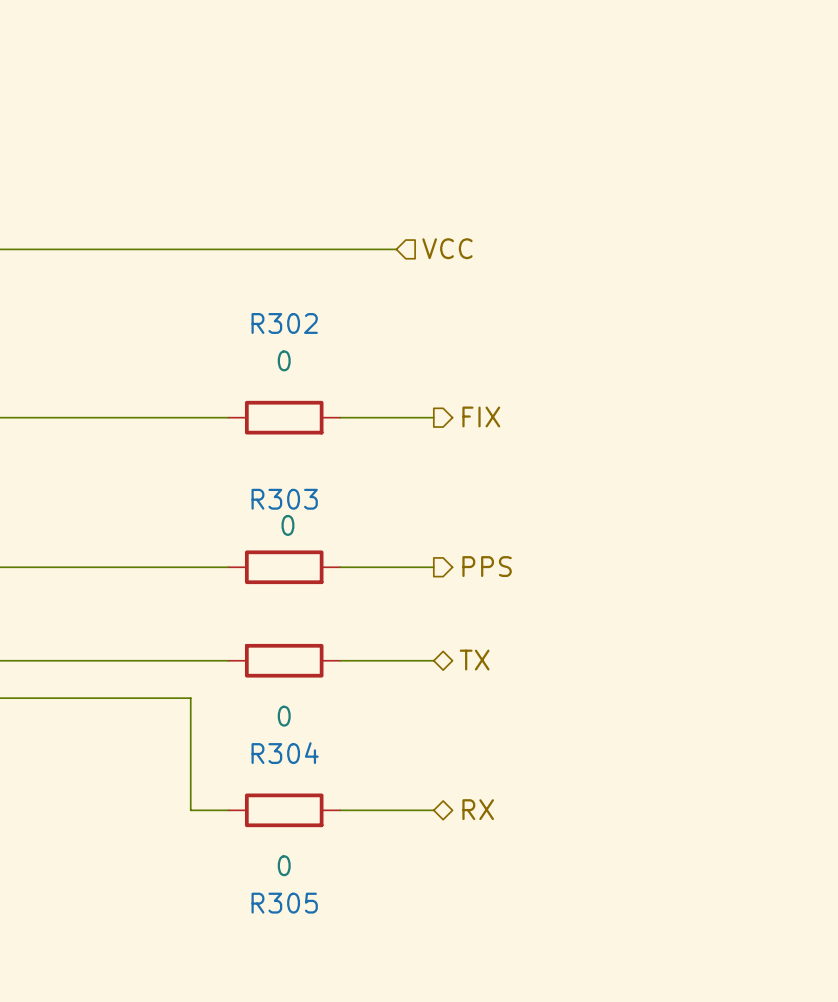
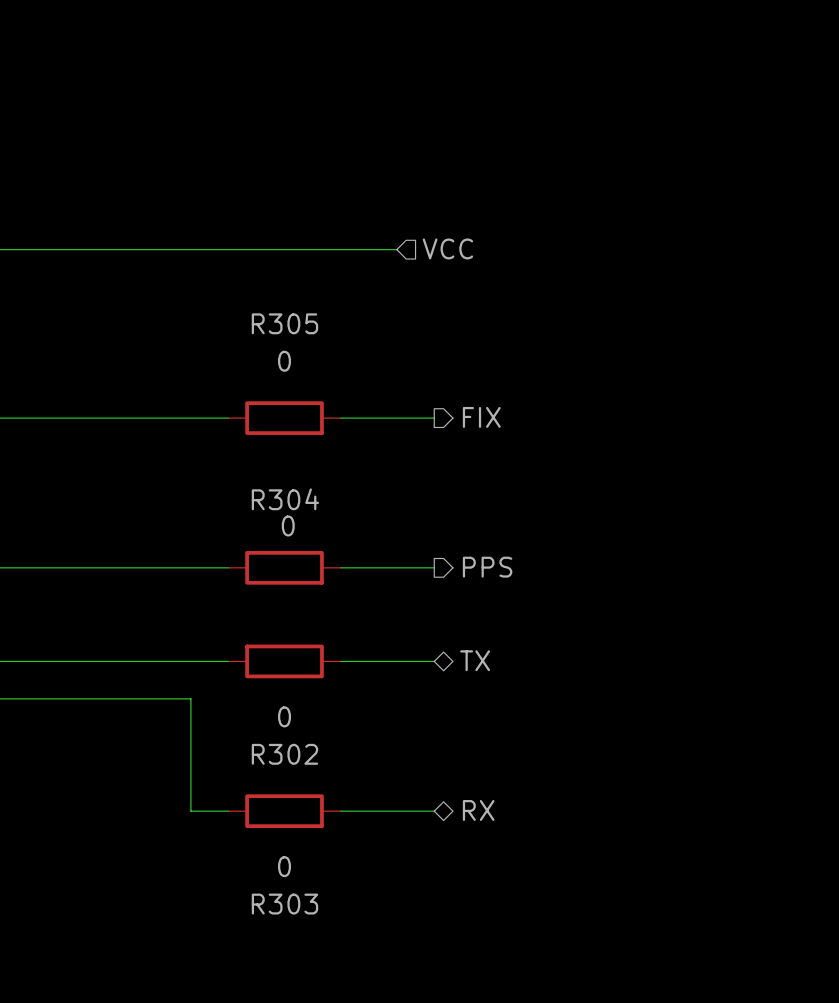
R302 name: R302 (284, 323) -> R305 (284, 323)
R303 name: R303 (284, 499) -> R304 (285, 499)
R304 name: R304 (285, 753) -> R302 (284, 754)
R305 name: R305 (284, 903) -> R303 (284, 904)

